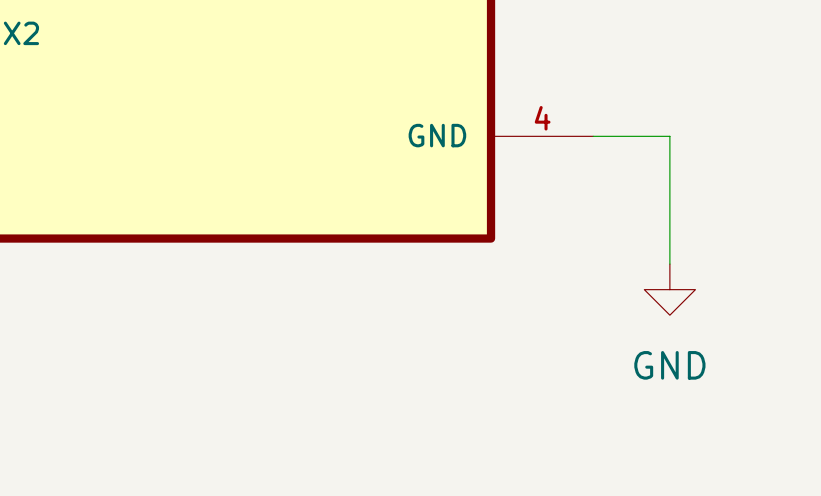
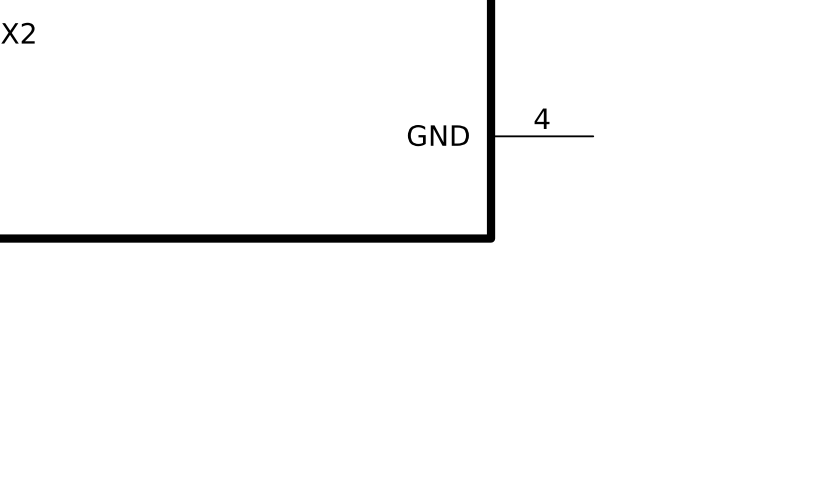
wire: (593, 136) (669, 136) (669, 264) -> none
power symbol: GND (669, 289) -> none

